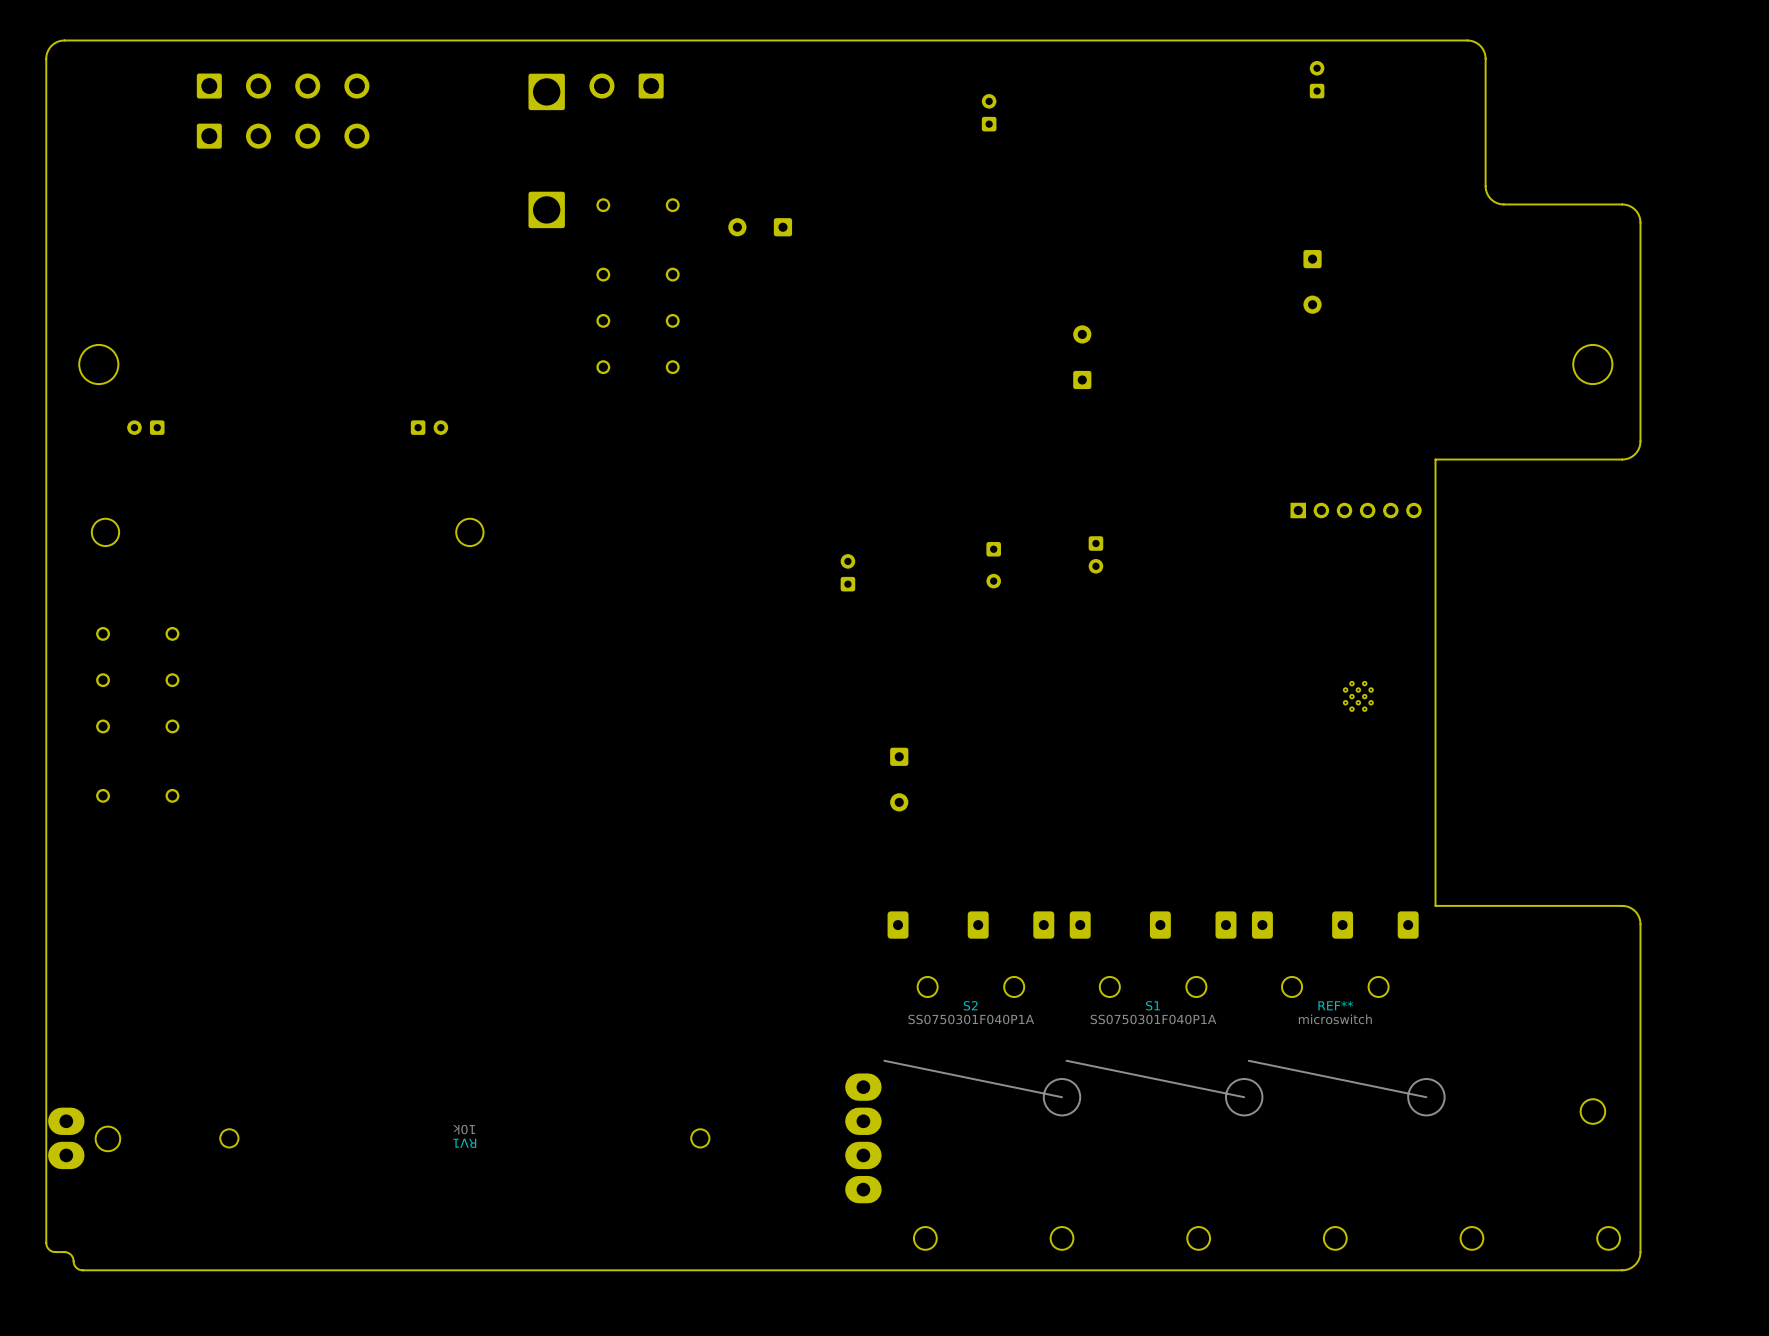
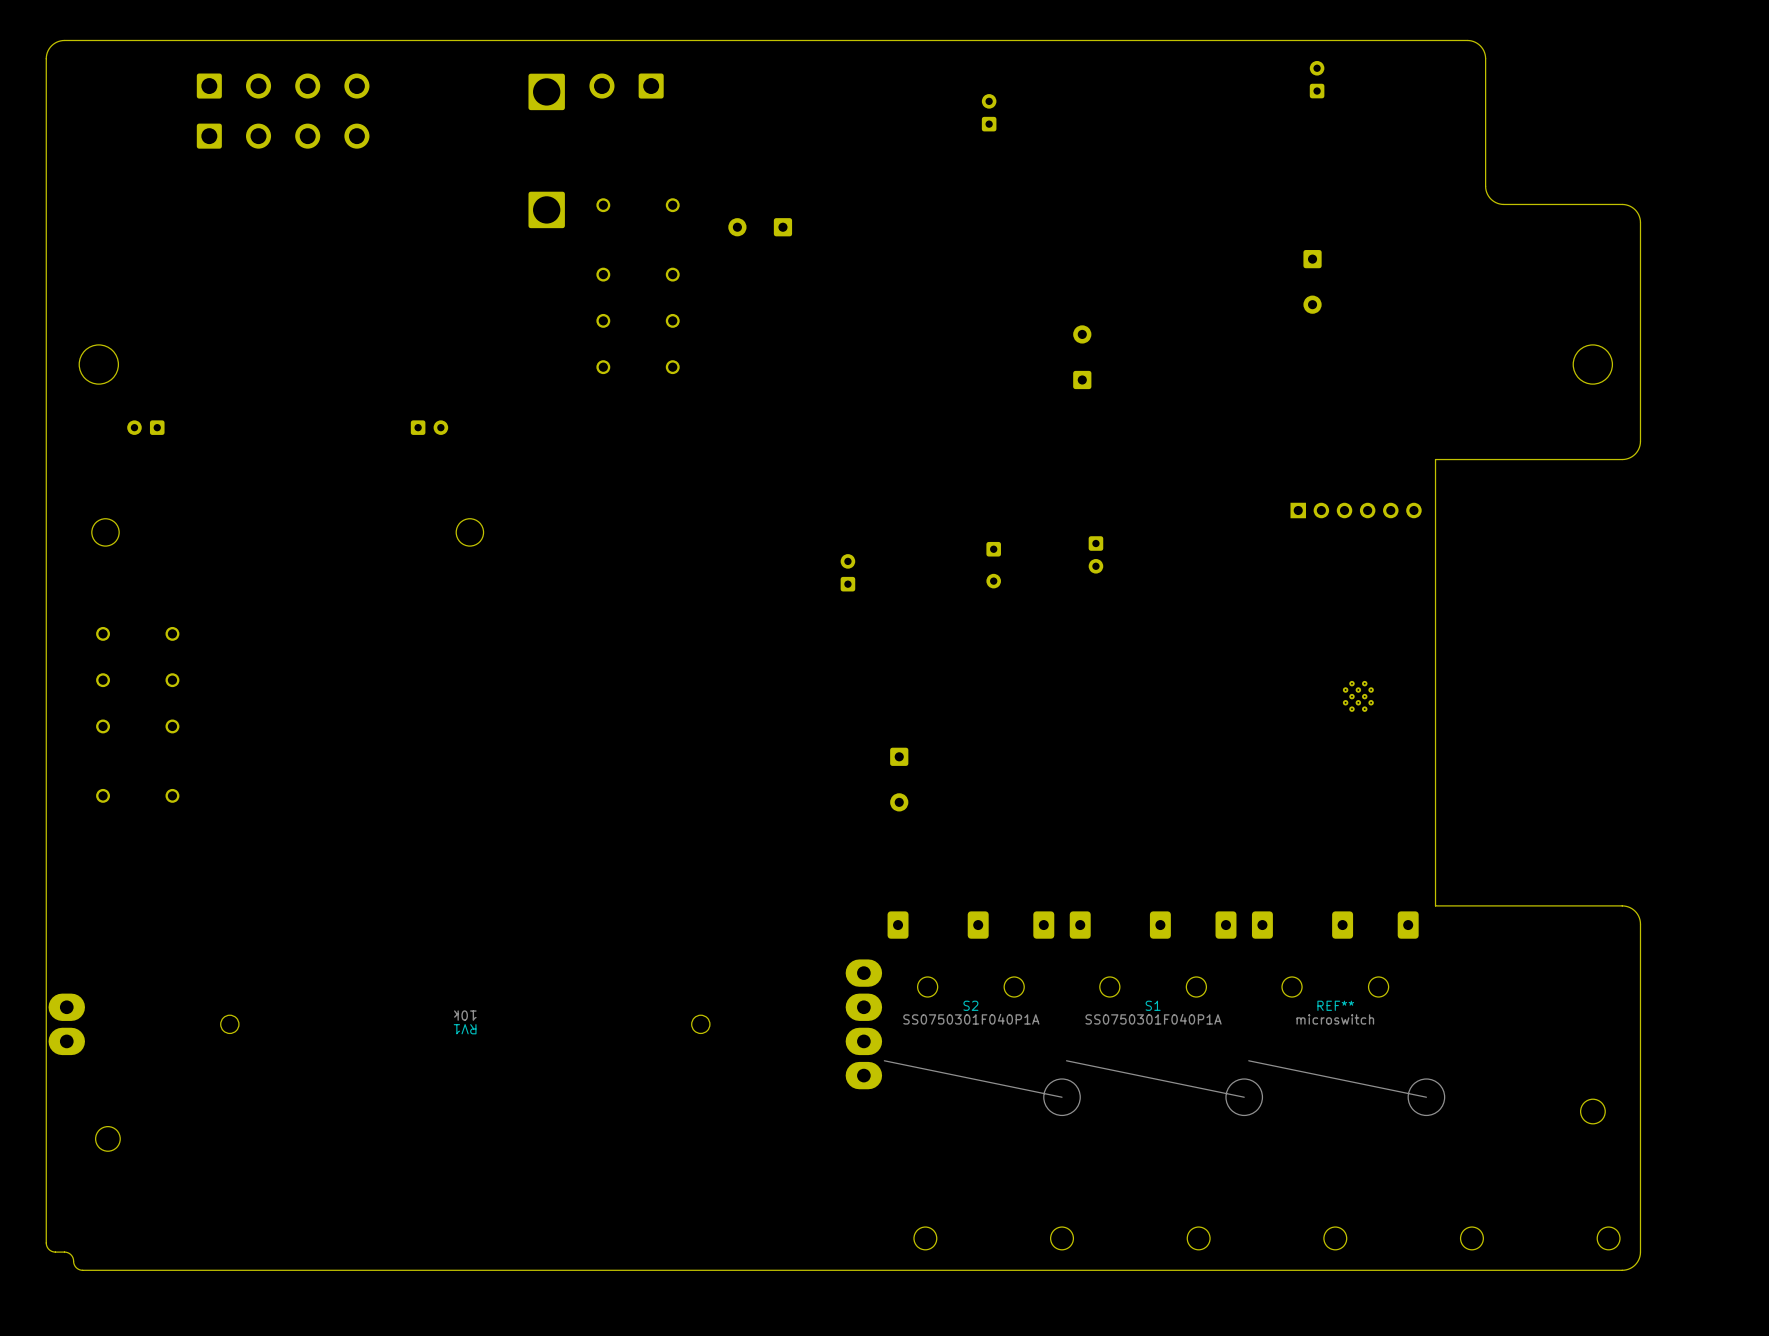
RV1 position: (464, 1138) -> (465, 1024)

